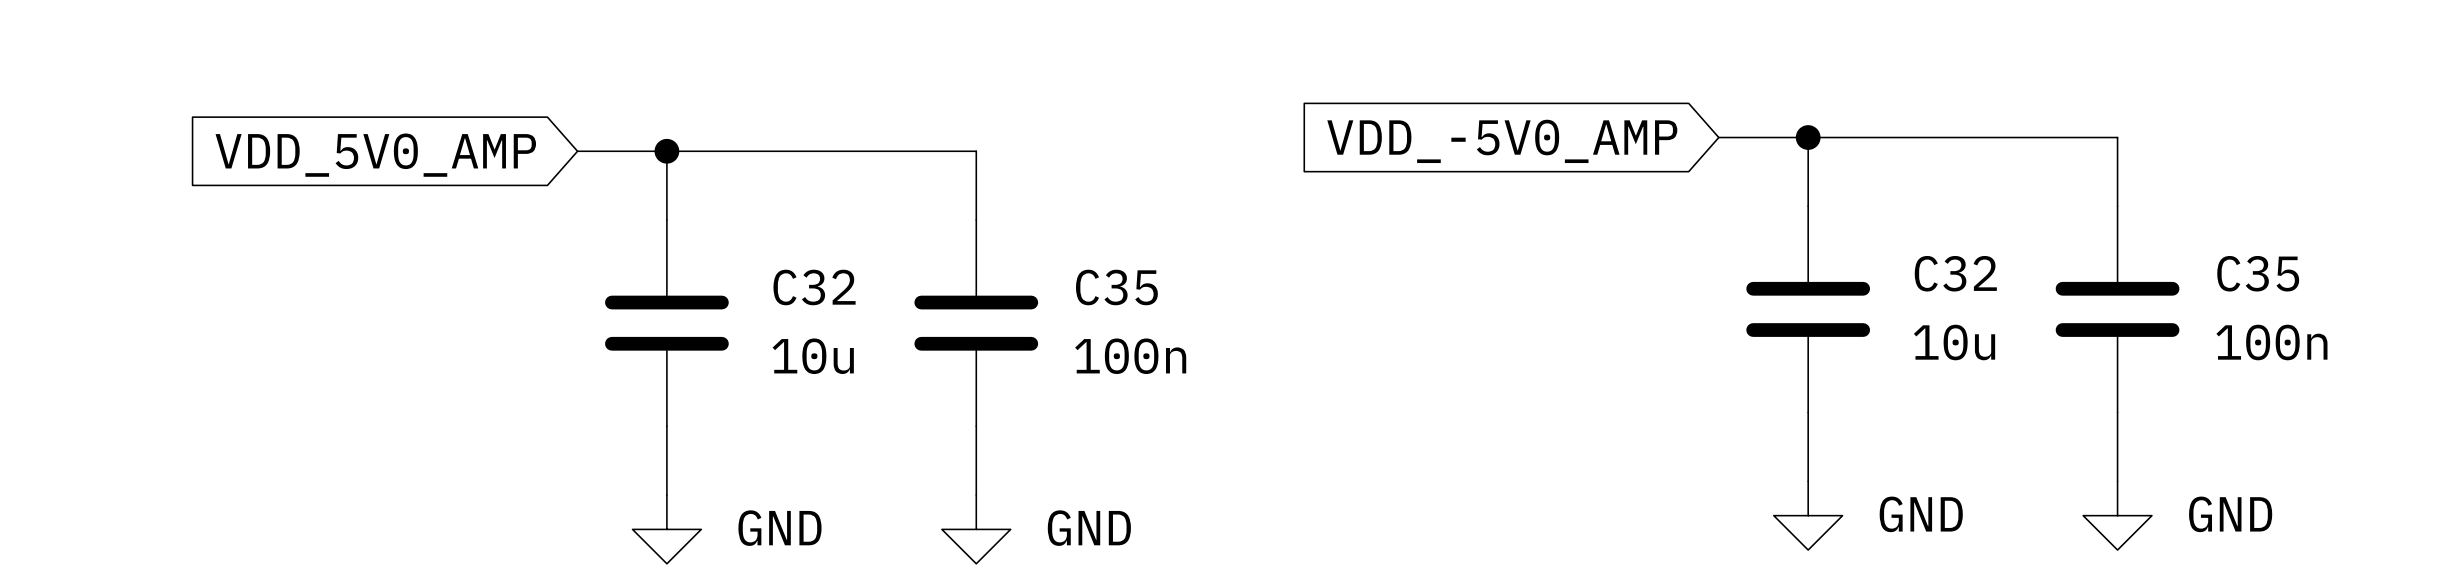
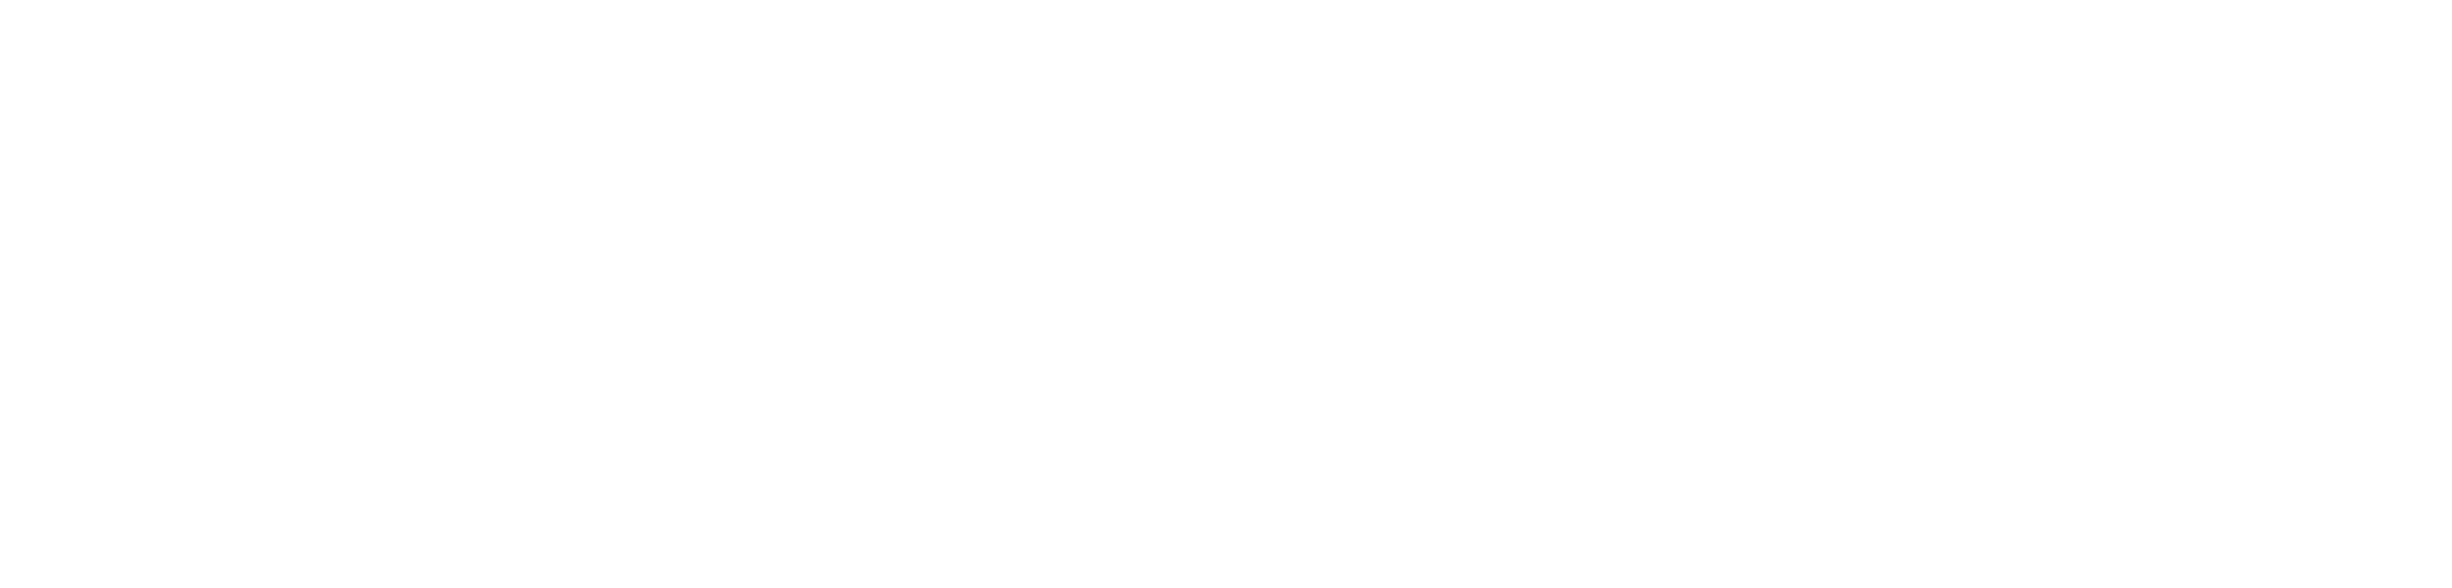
wire: (1718, 137) (2117, 137) (2117, 206) -> none
wire: (1808, 137) (1808, 206) -> none
junction: (1808, 137) -> none
global label: VDD_-5V0_AMP (1502, 141) -> none
wire: (577, 151) (976, 151) (976, 220) -> none
wire: (666, 151) (666, 220) -> none
junction: (666, 151) -> none
global label: VDD_5V0_AMP (375, 155) -> none
C32: 10u (1808, 309) -> none
C35: 100n (2117, 309) -> none
C32: 10u (666, 323) -> none
C35: 100n (976, 323) -> none
wire: (1808, 412) (1808, 481) -> none
wire: (2117, 412) (2117, 481) -> none
wire: (666, 426) (666, 495) -> none
wire: (976, 426) (976, 495) -> none
power symbol: GND (1808, 515) -> none
power symbol: GND (2117, 515) -> none
power symbol: GND (666, 529) -> none
power symbol: GND (976, 529) -> none

